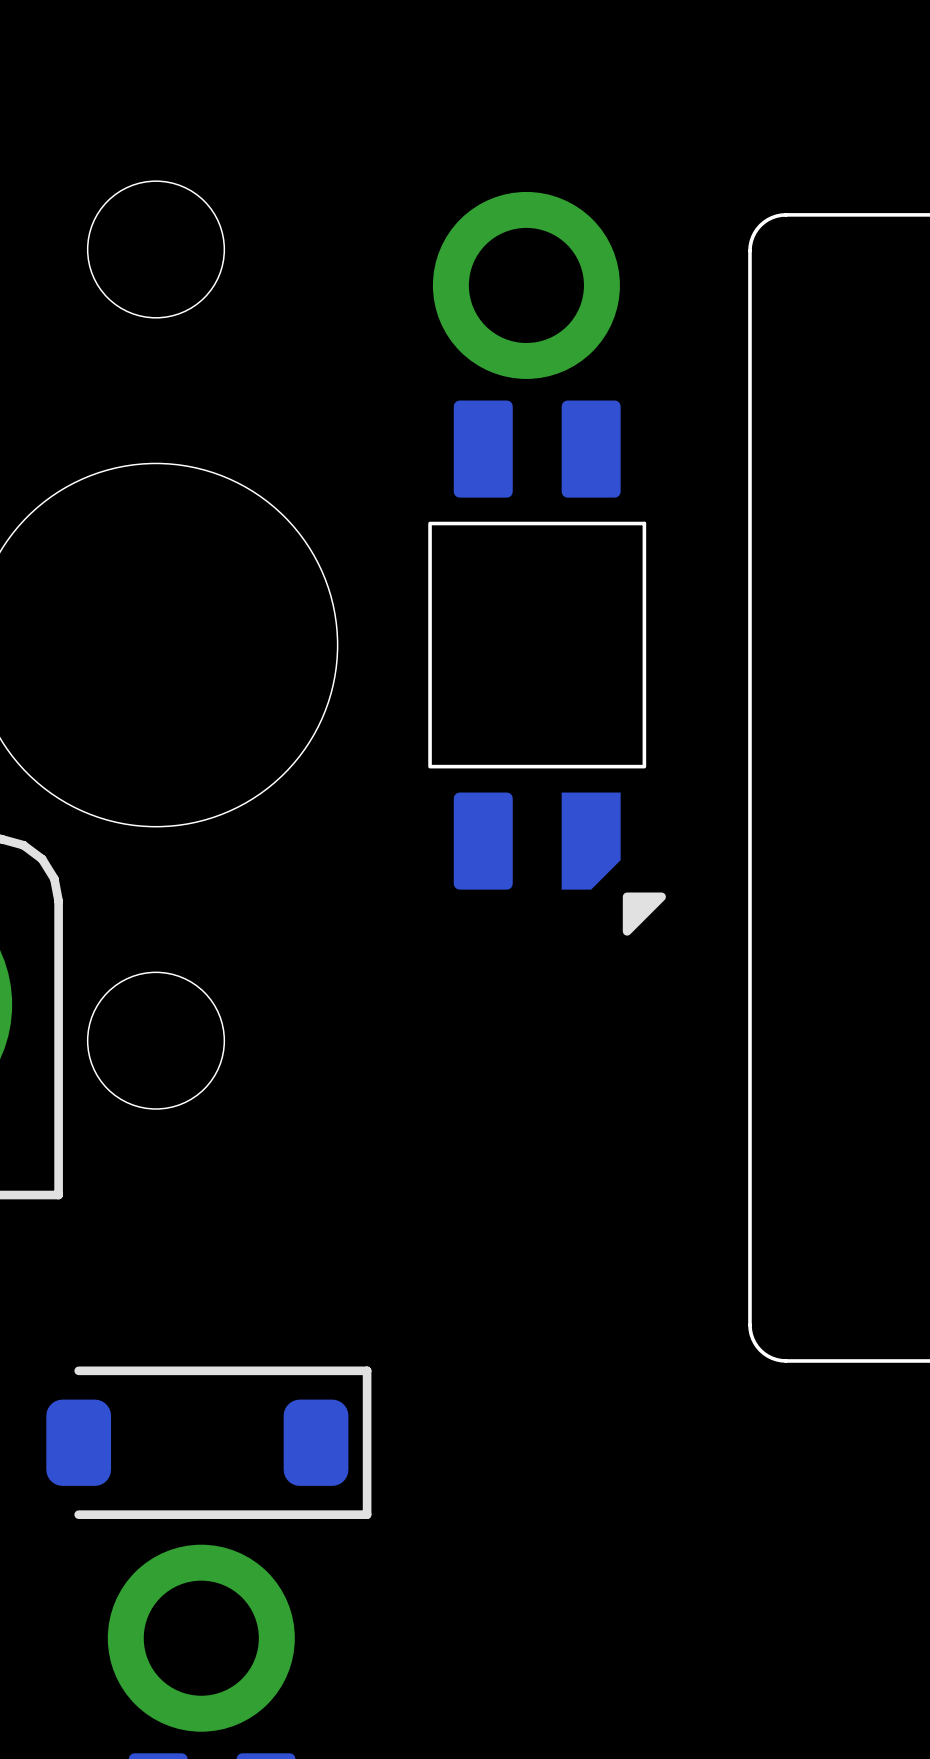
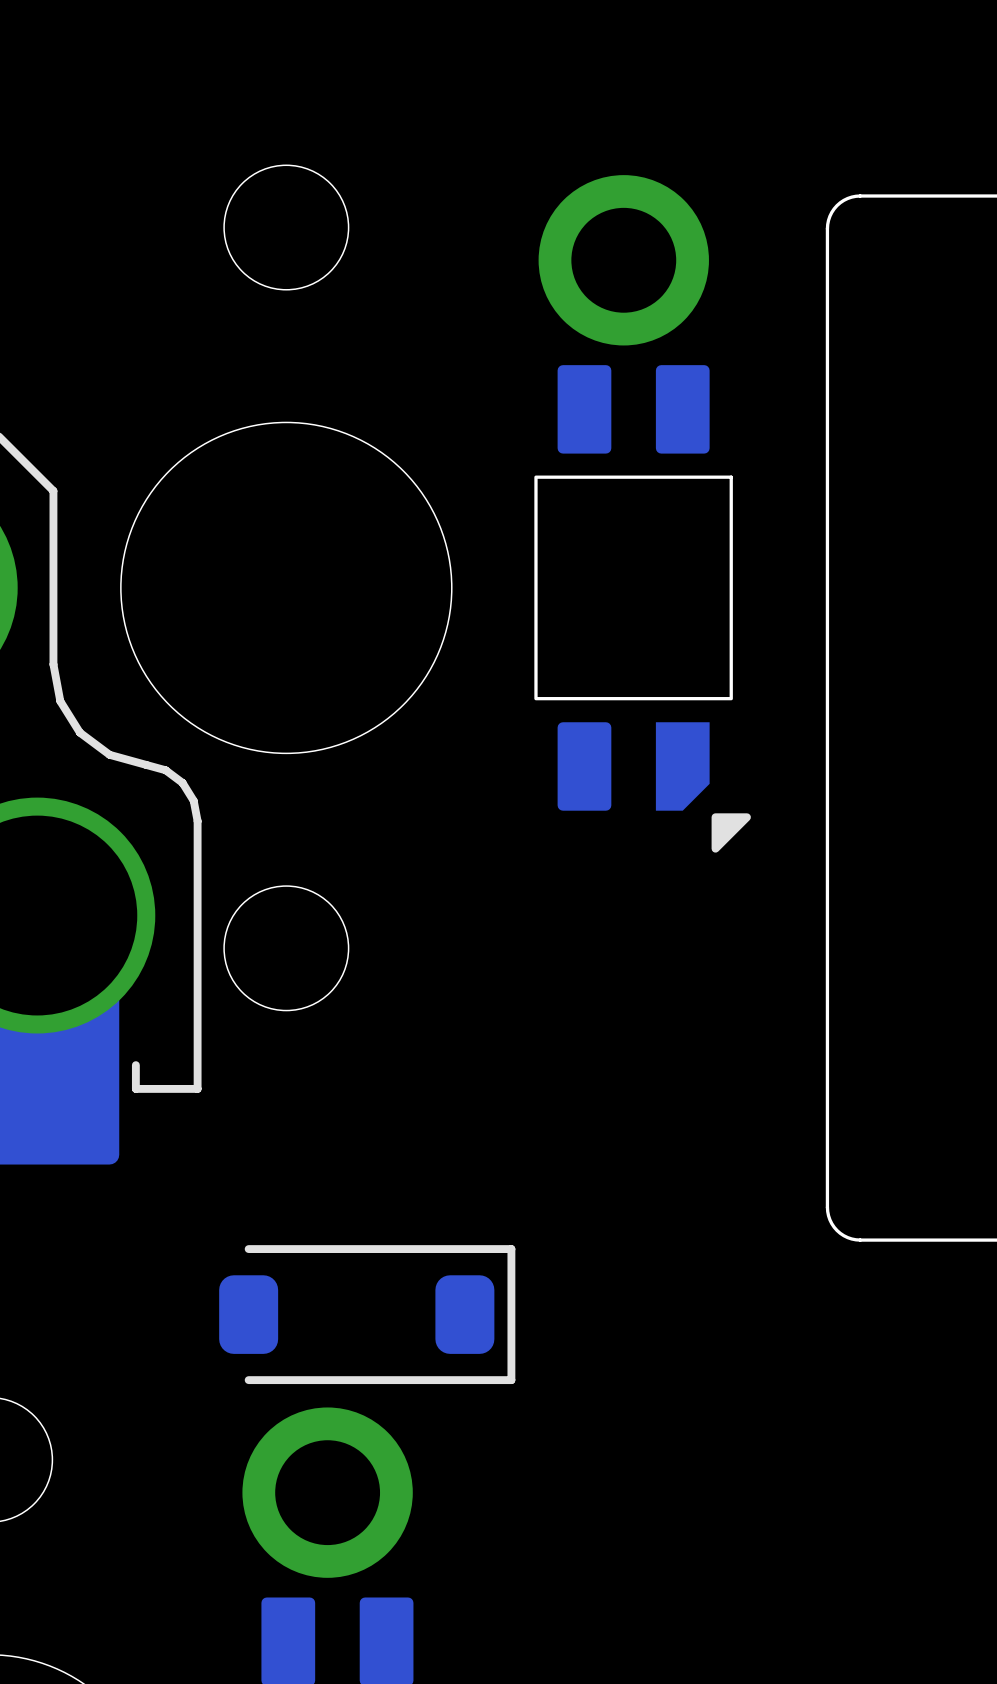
part position: (208, 1442) -> (367, 1314)

